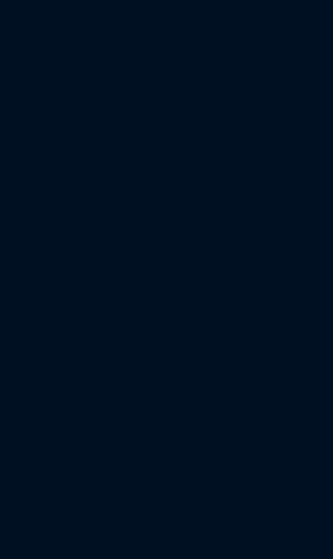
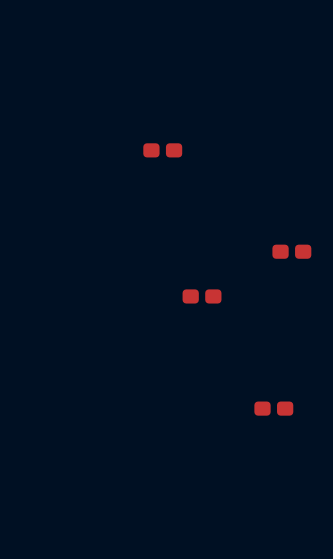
part: none -> (162, 150)
part: none -> (291, 251)
part: none -> (202, 296)
part: none -> (273, 408)

